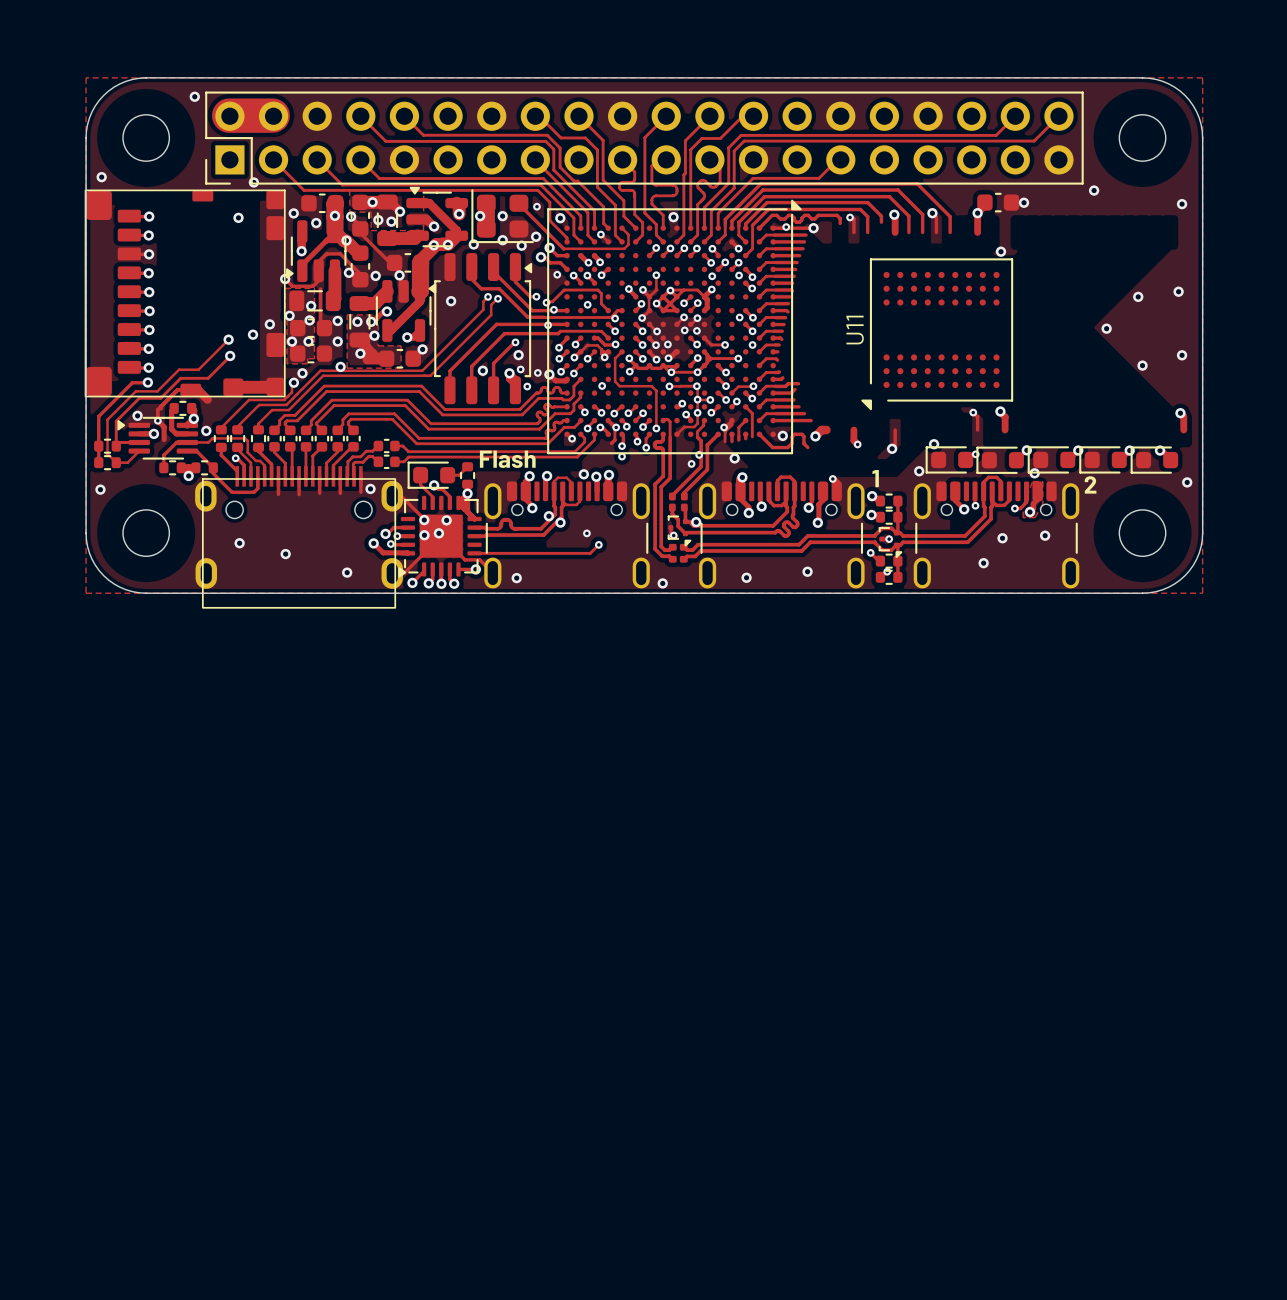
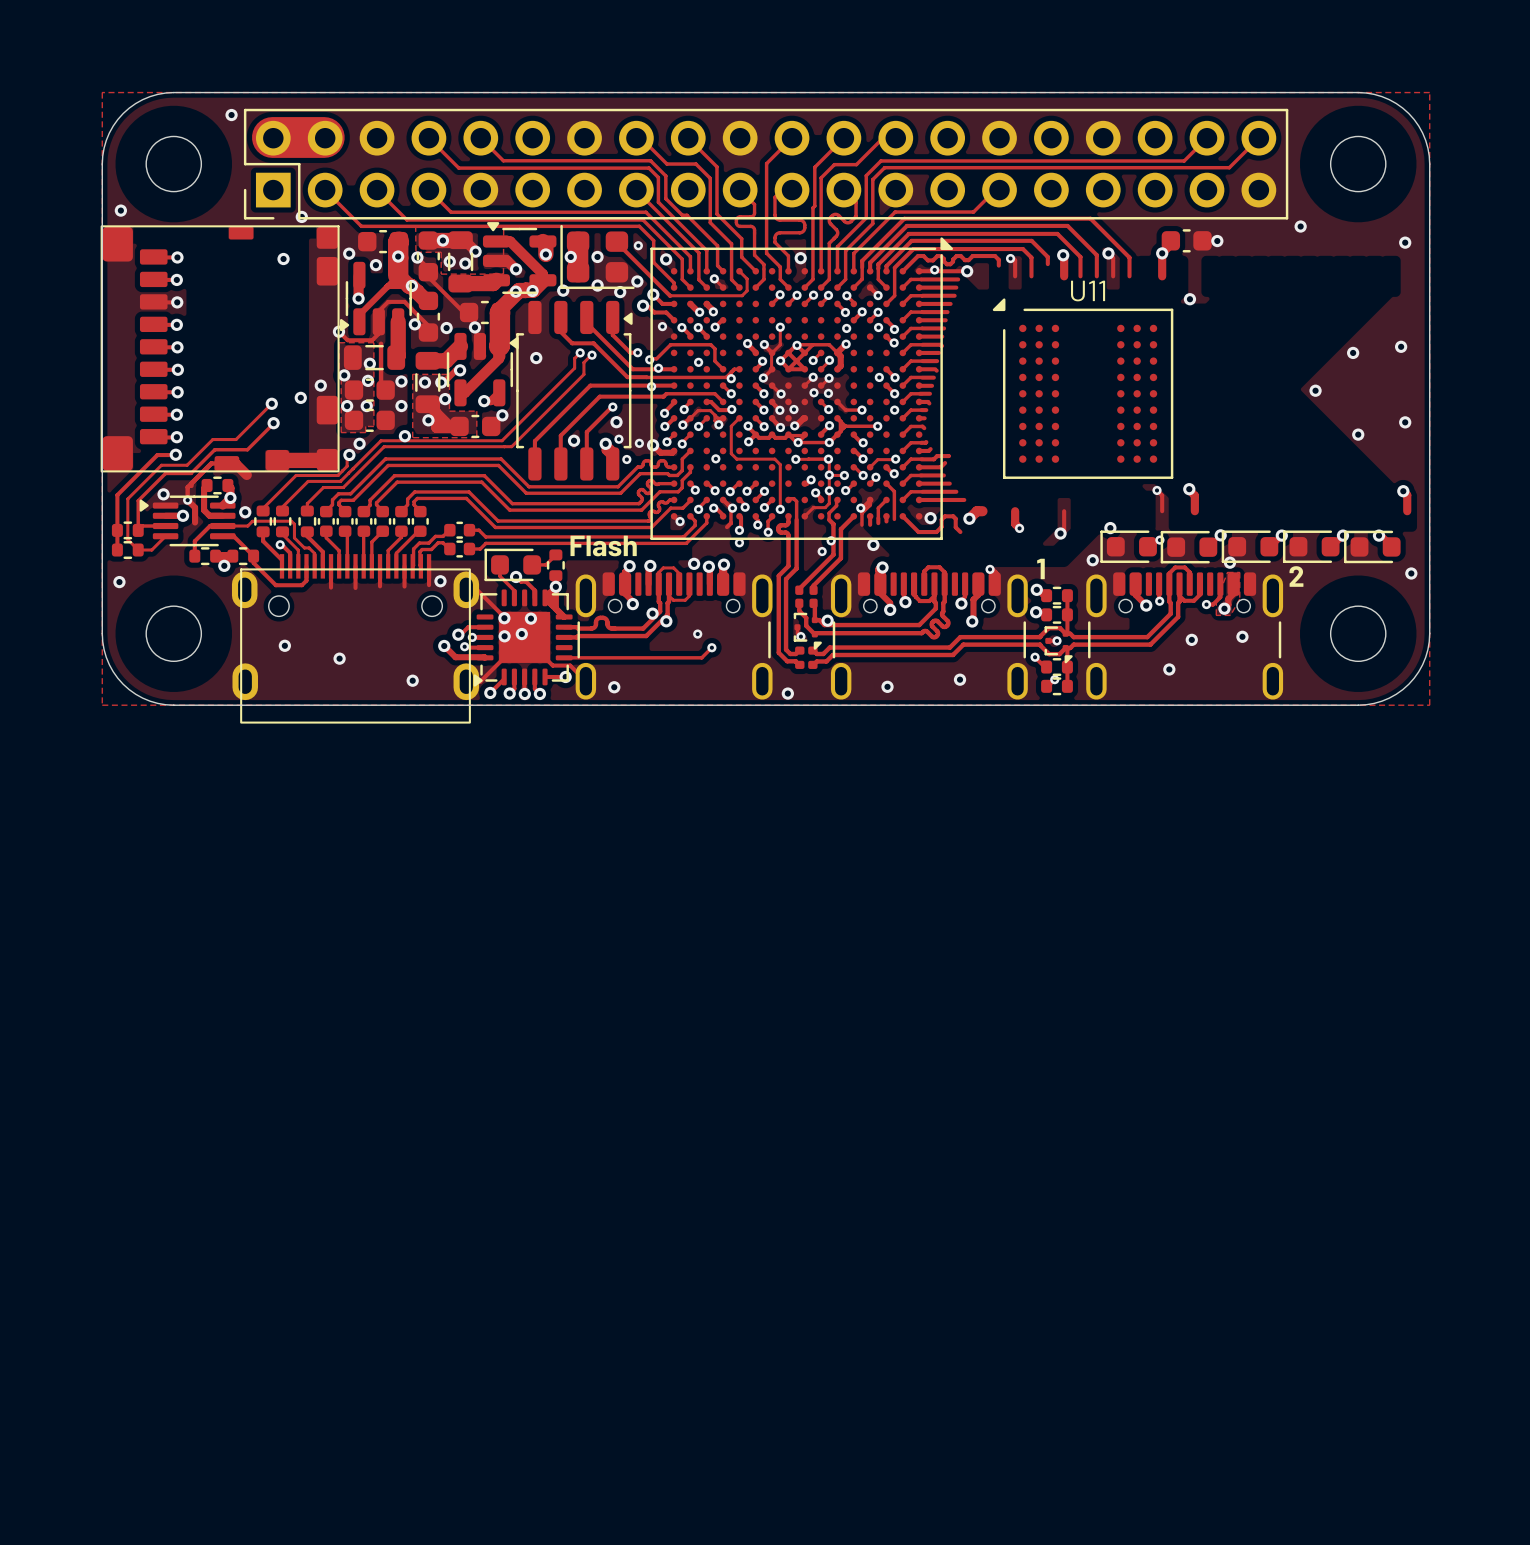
U11 rotation: 0° (937, 334) -> 90° clockwise (1083, 388)

